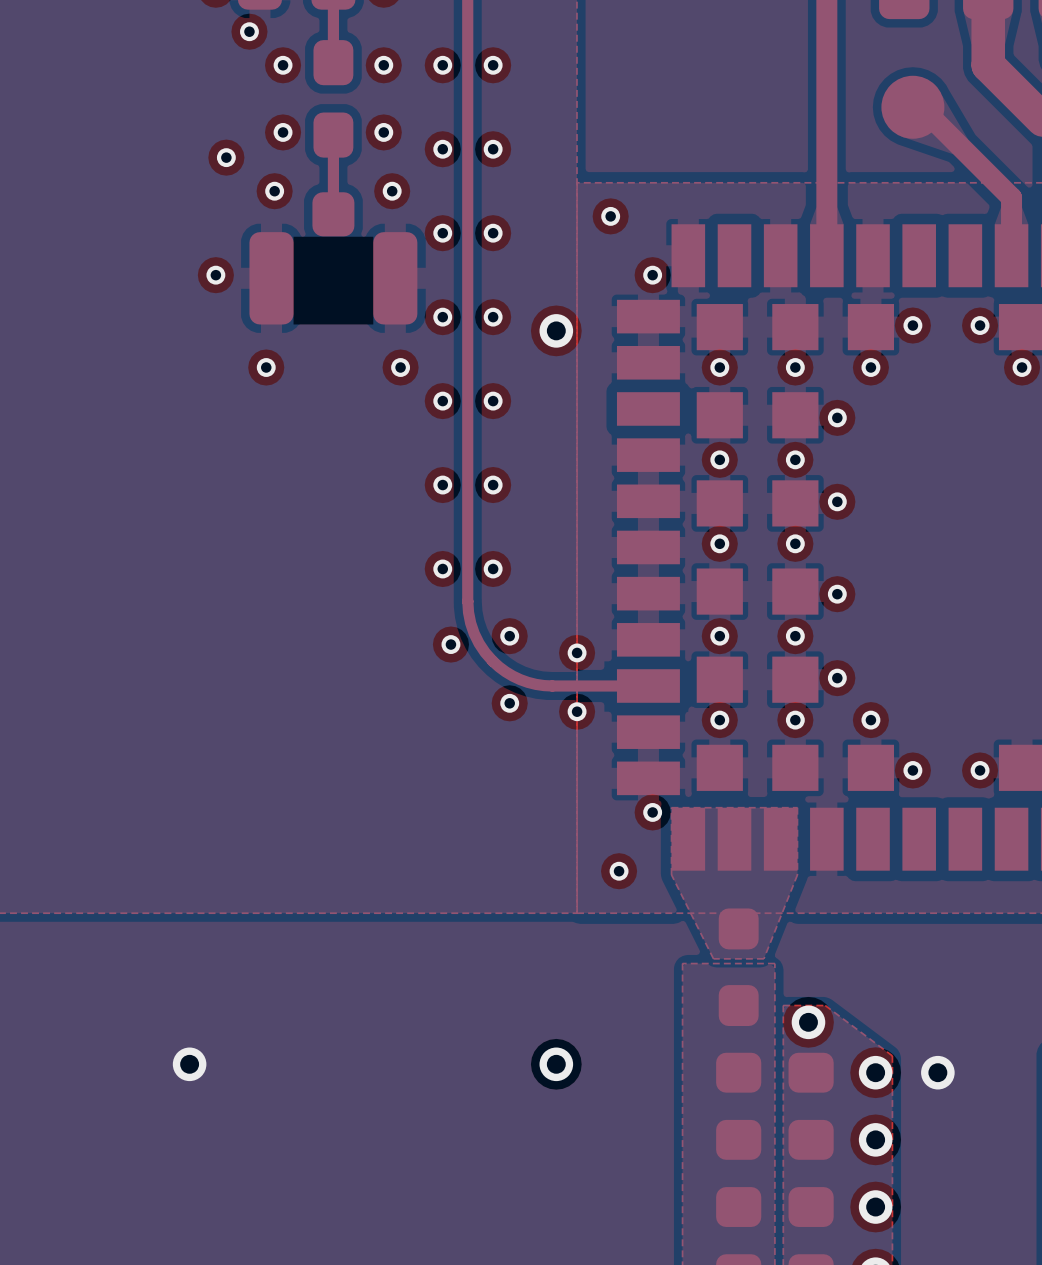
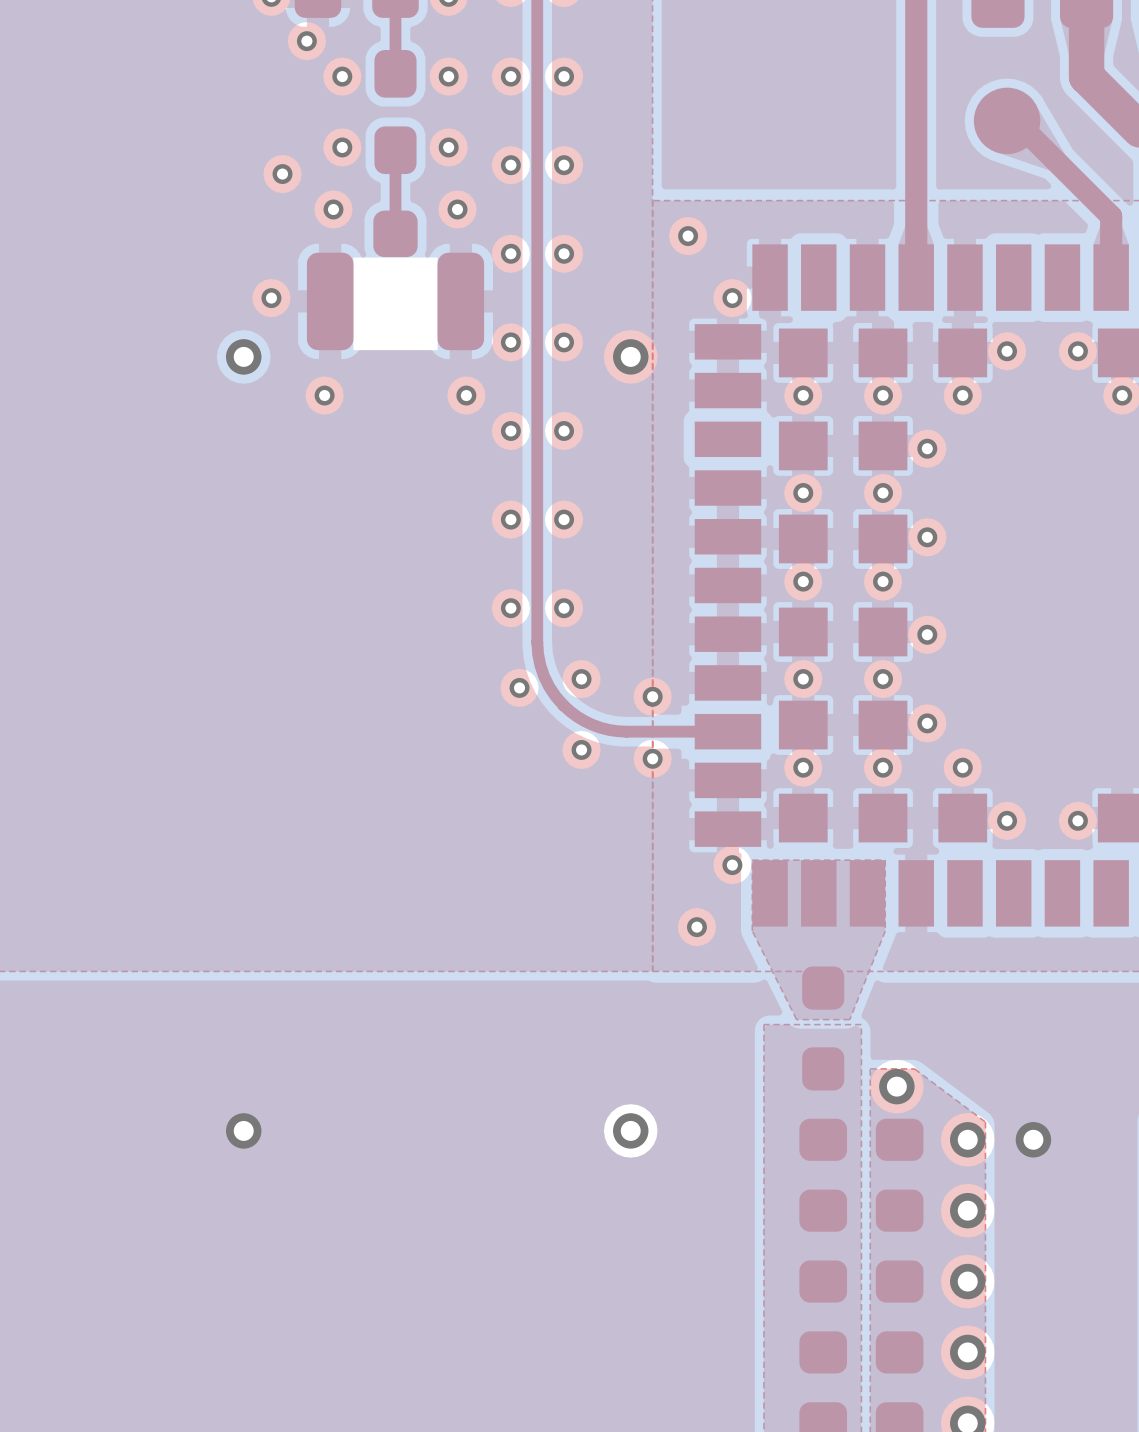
via: none -> (243, 356)

